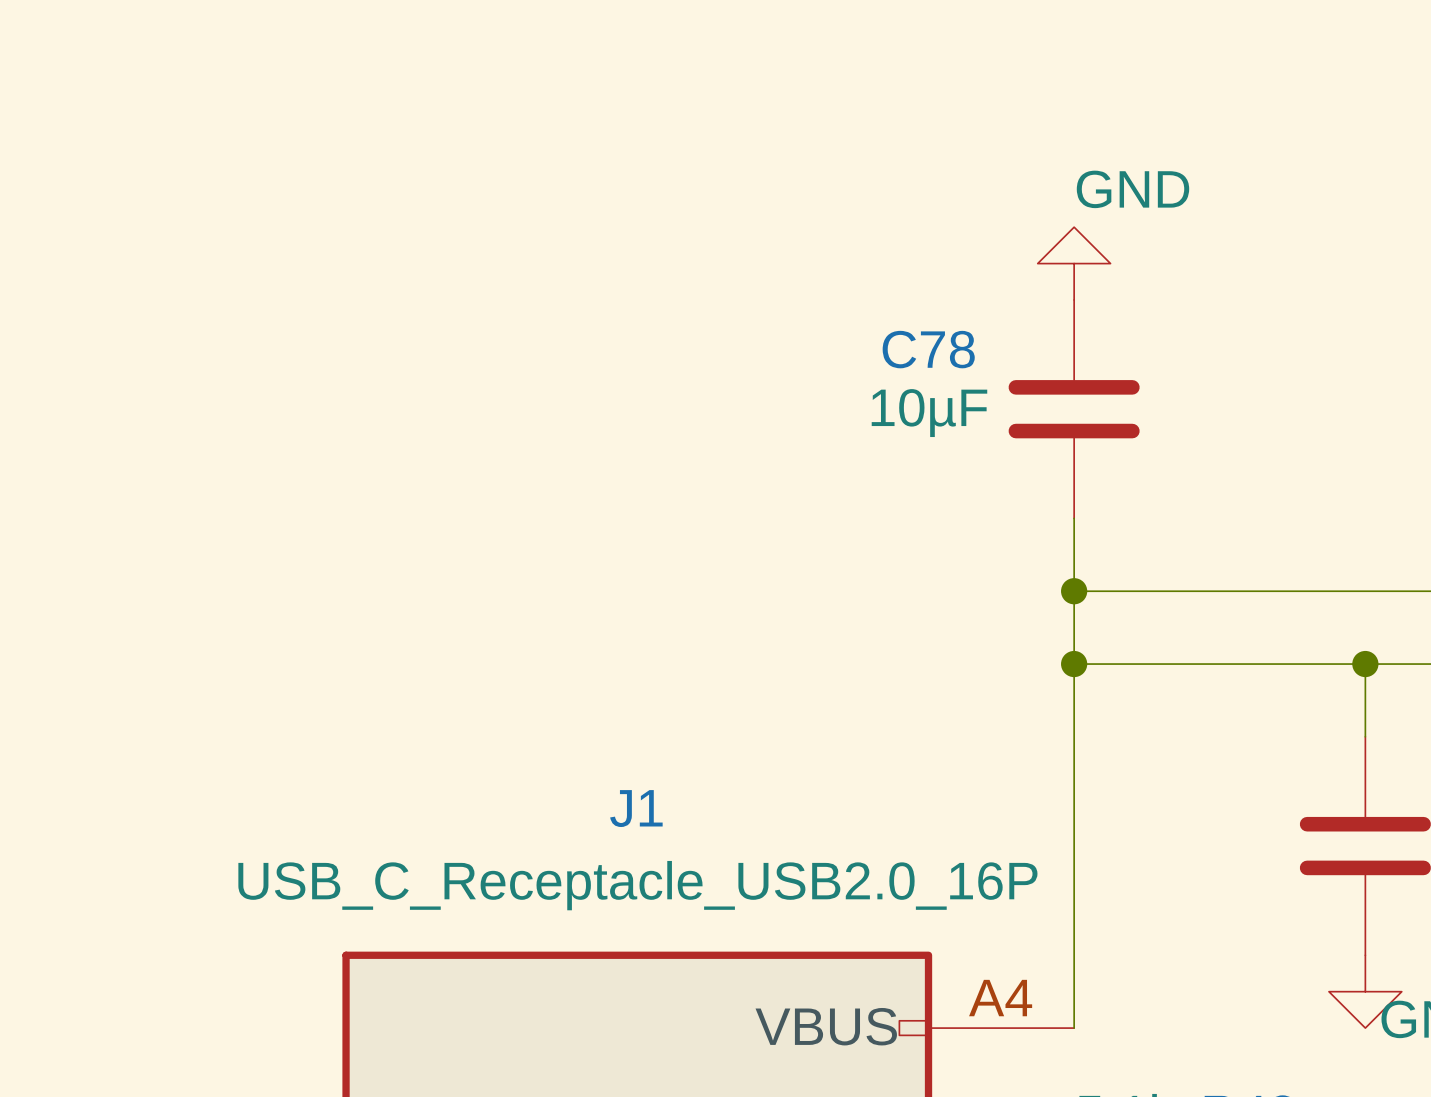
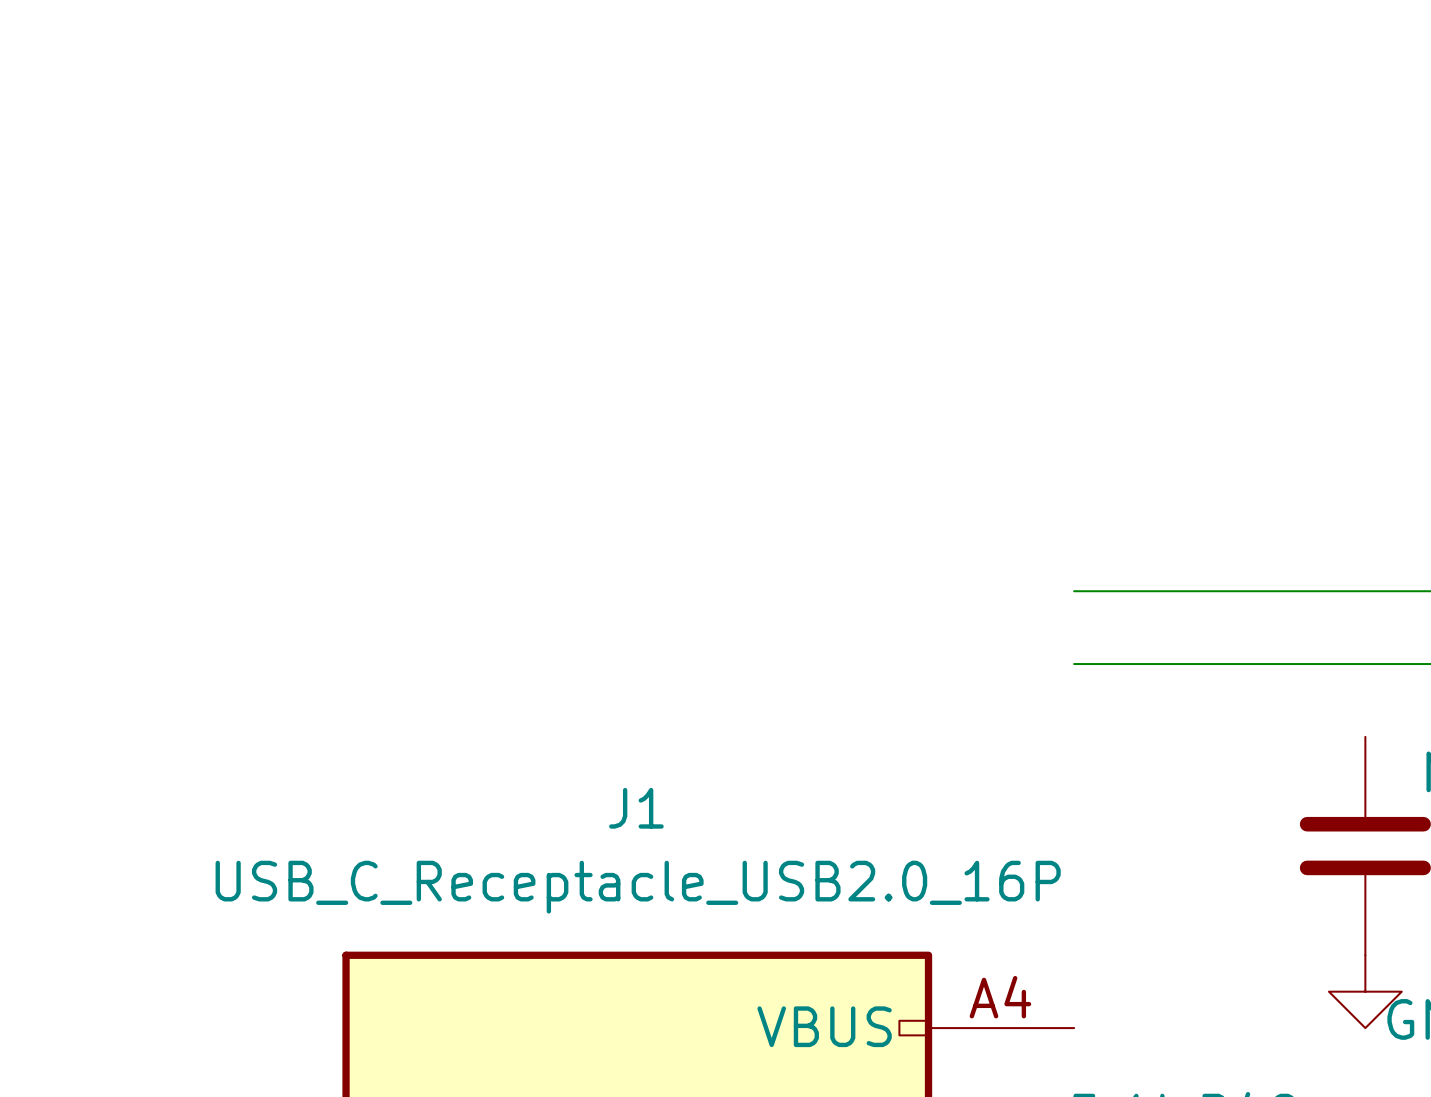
power symbol: GND (1074, 263) -> none
C78: 10µF (1074, 409) -> none
wire: (1074, 518) (1074, 1028) -> none
junction: (1074, 591) -> none
junction: (1074, 664) -> none
wire: (1365, 664) (1365, 736) -> none
junction: (1365, 664) -> none

